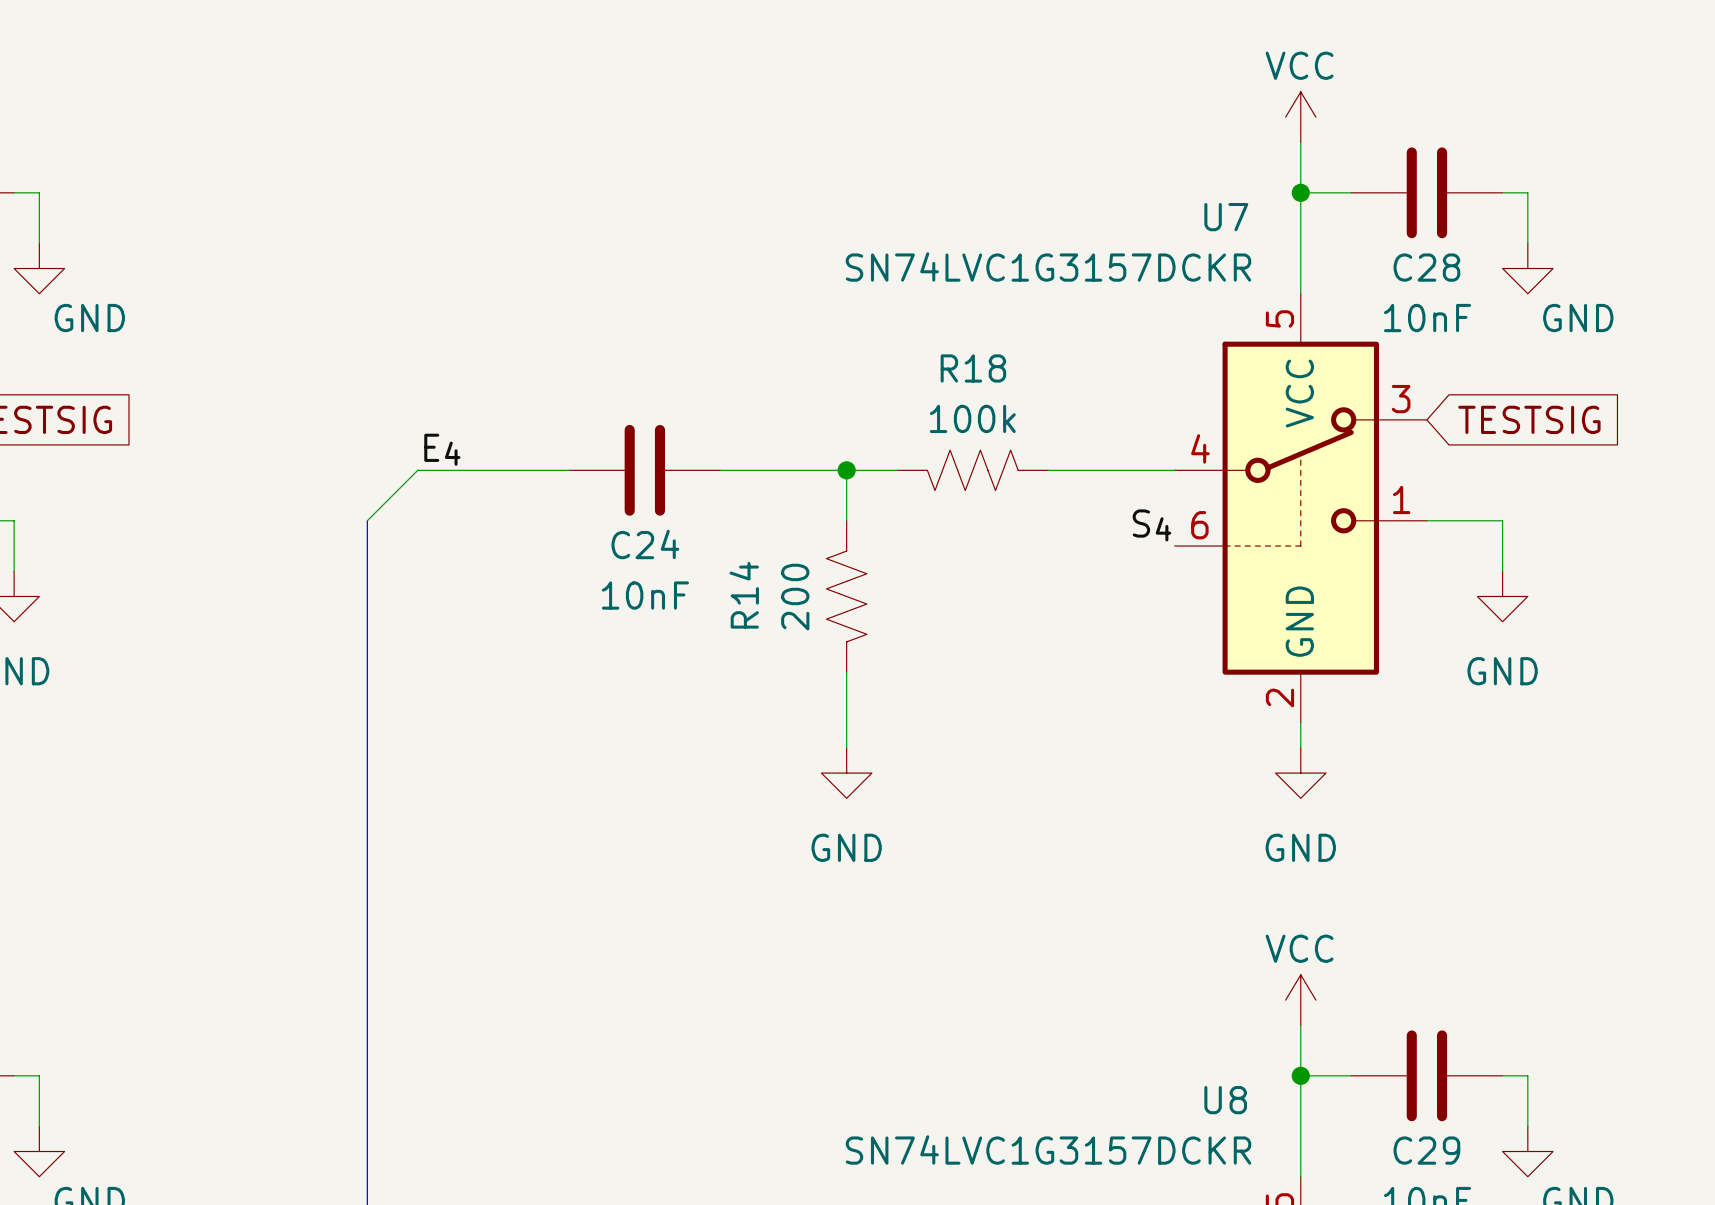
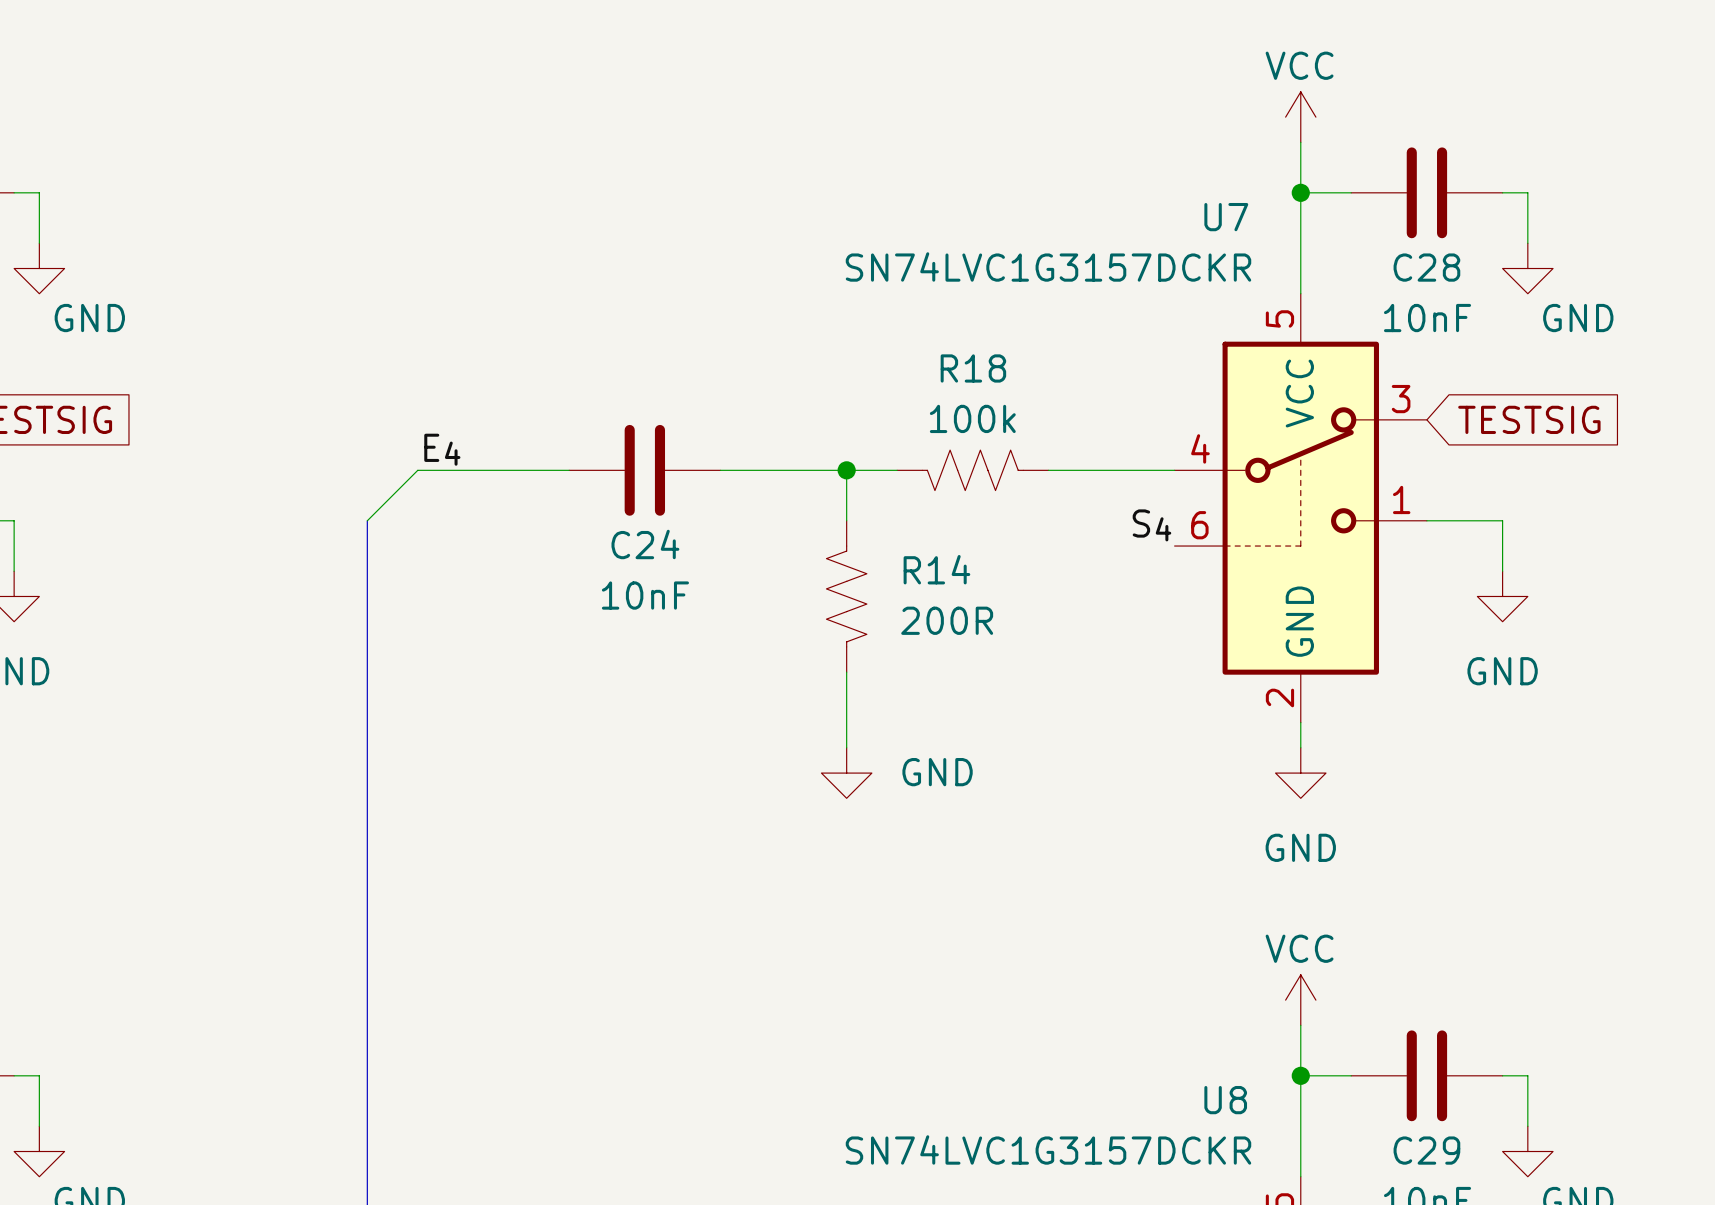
R14 name rotation: 0° (744, 595) -> 90° clockwise (936, 569)
R14 name position: R14 (744, 595) -> R14 (936, 569)
R14 value: 200 (795, 597) -> 200R (947, 620)
power symbol text position: GND (846, 847) -> GND (937, 772)

